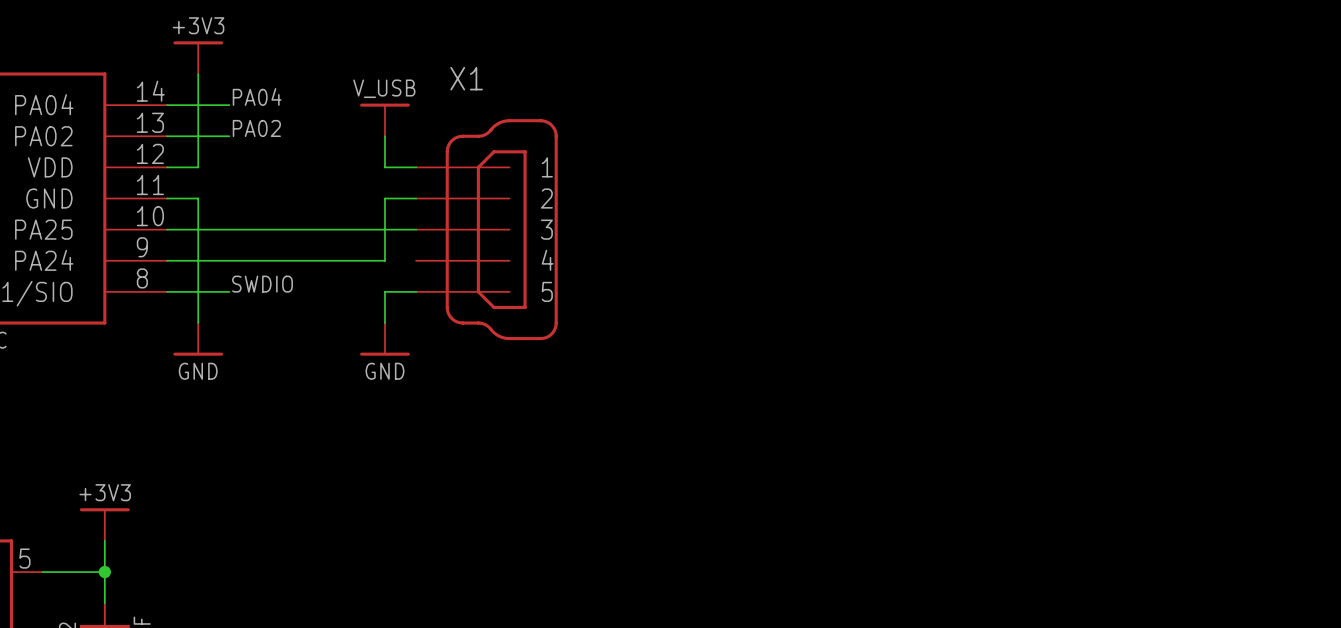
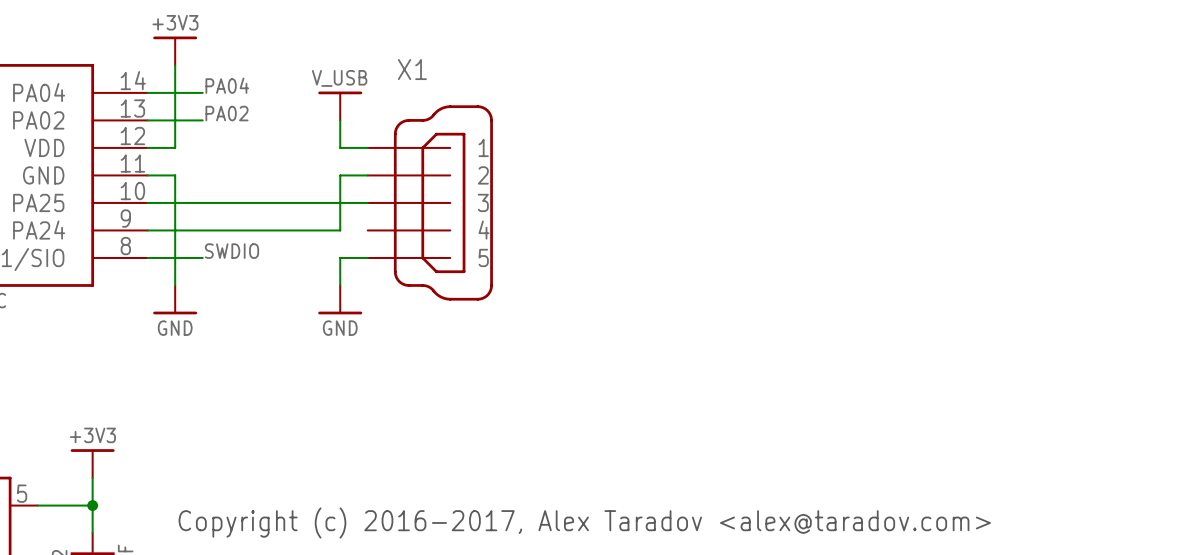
text: none -> Copyright (c) 2016-2017, Alex Taradov <alex@taradov.com> (584, 522)

